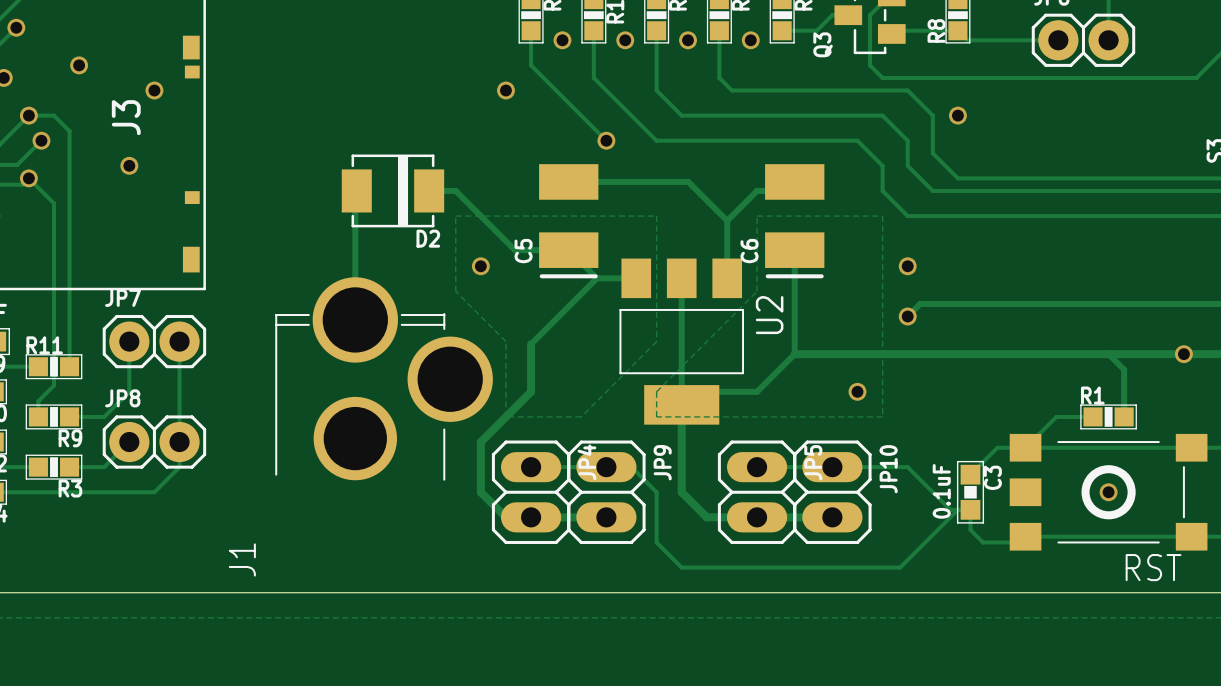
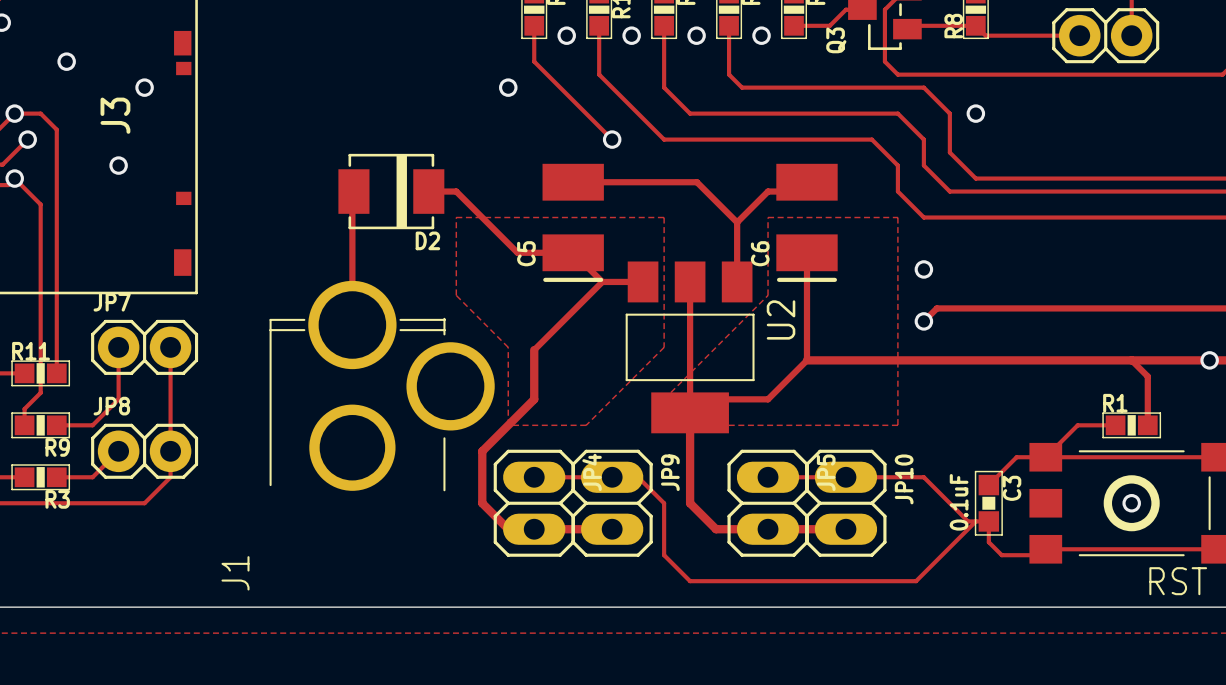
via: (480, 266) -> none
via: (857, 391) -> none

